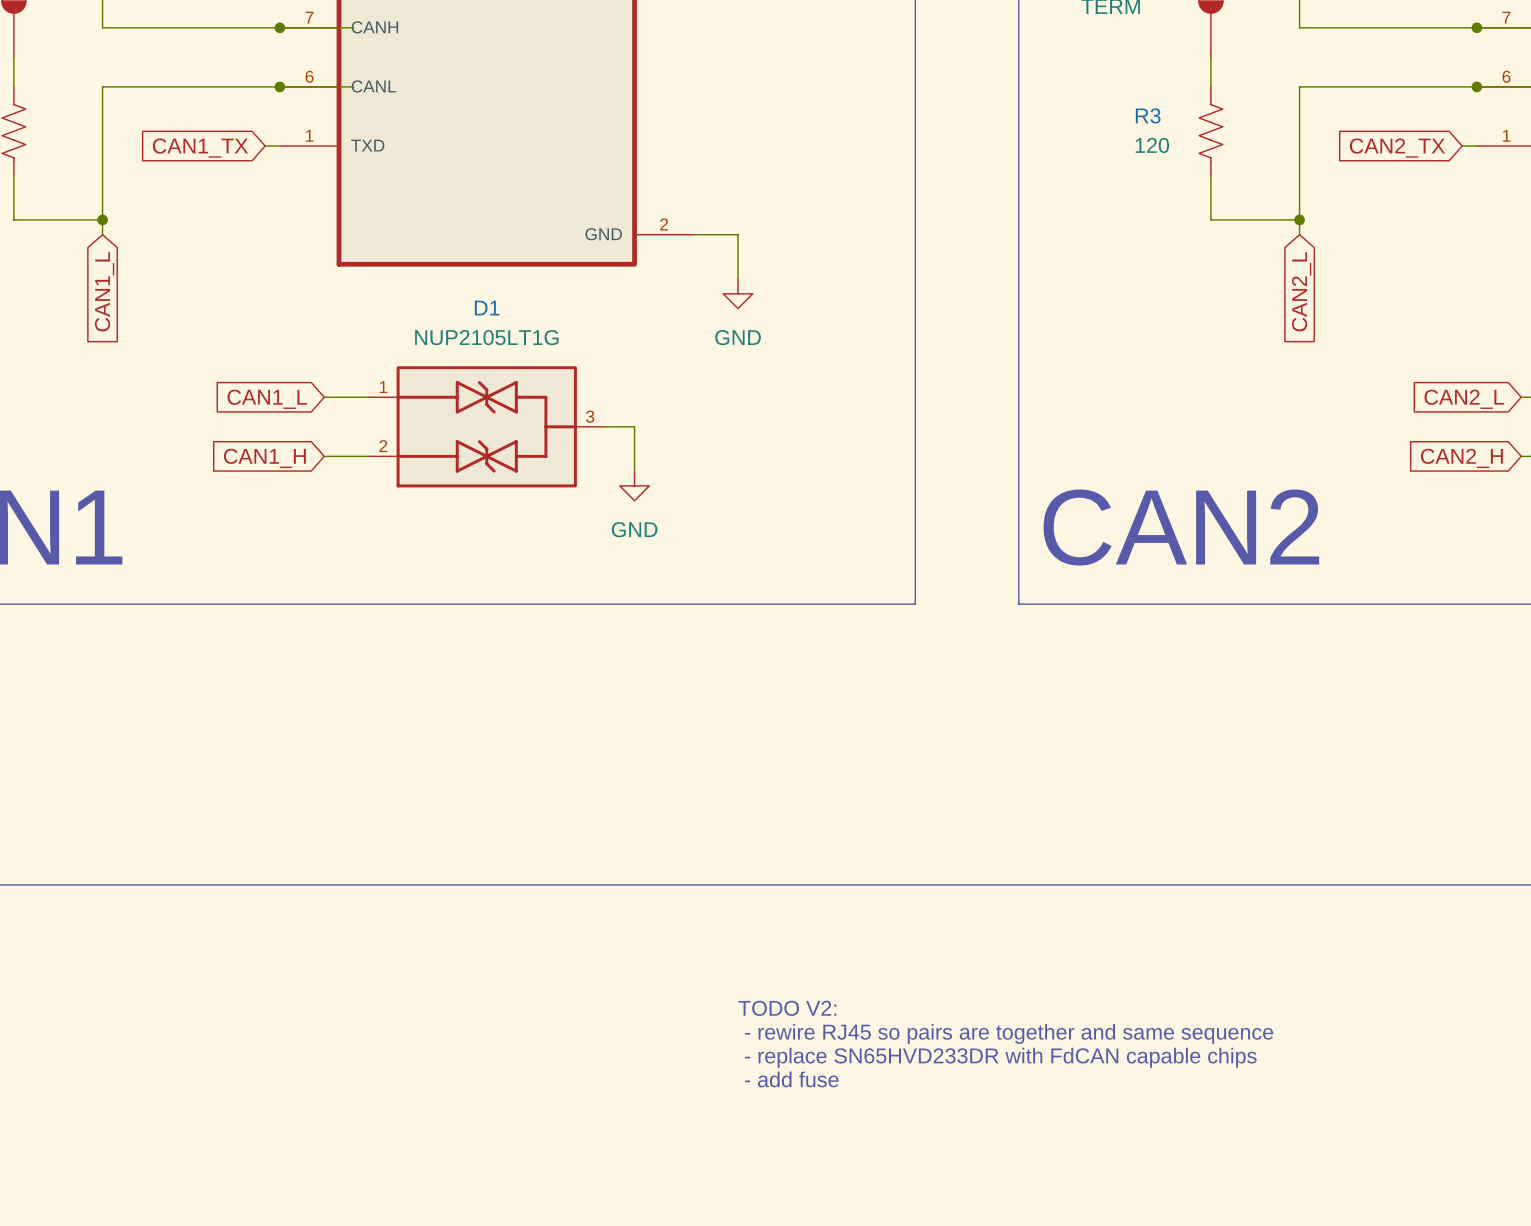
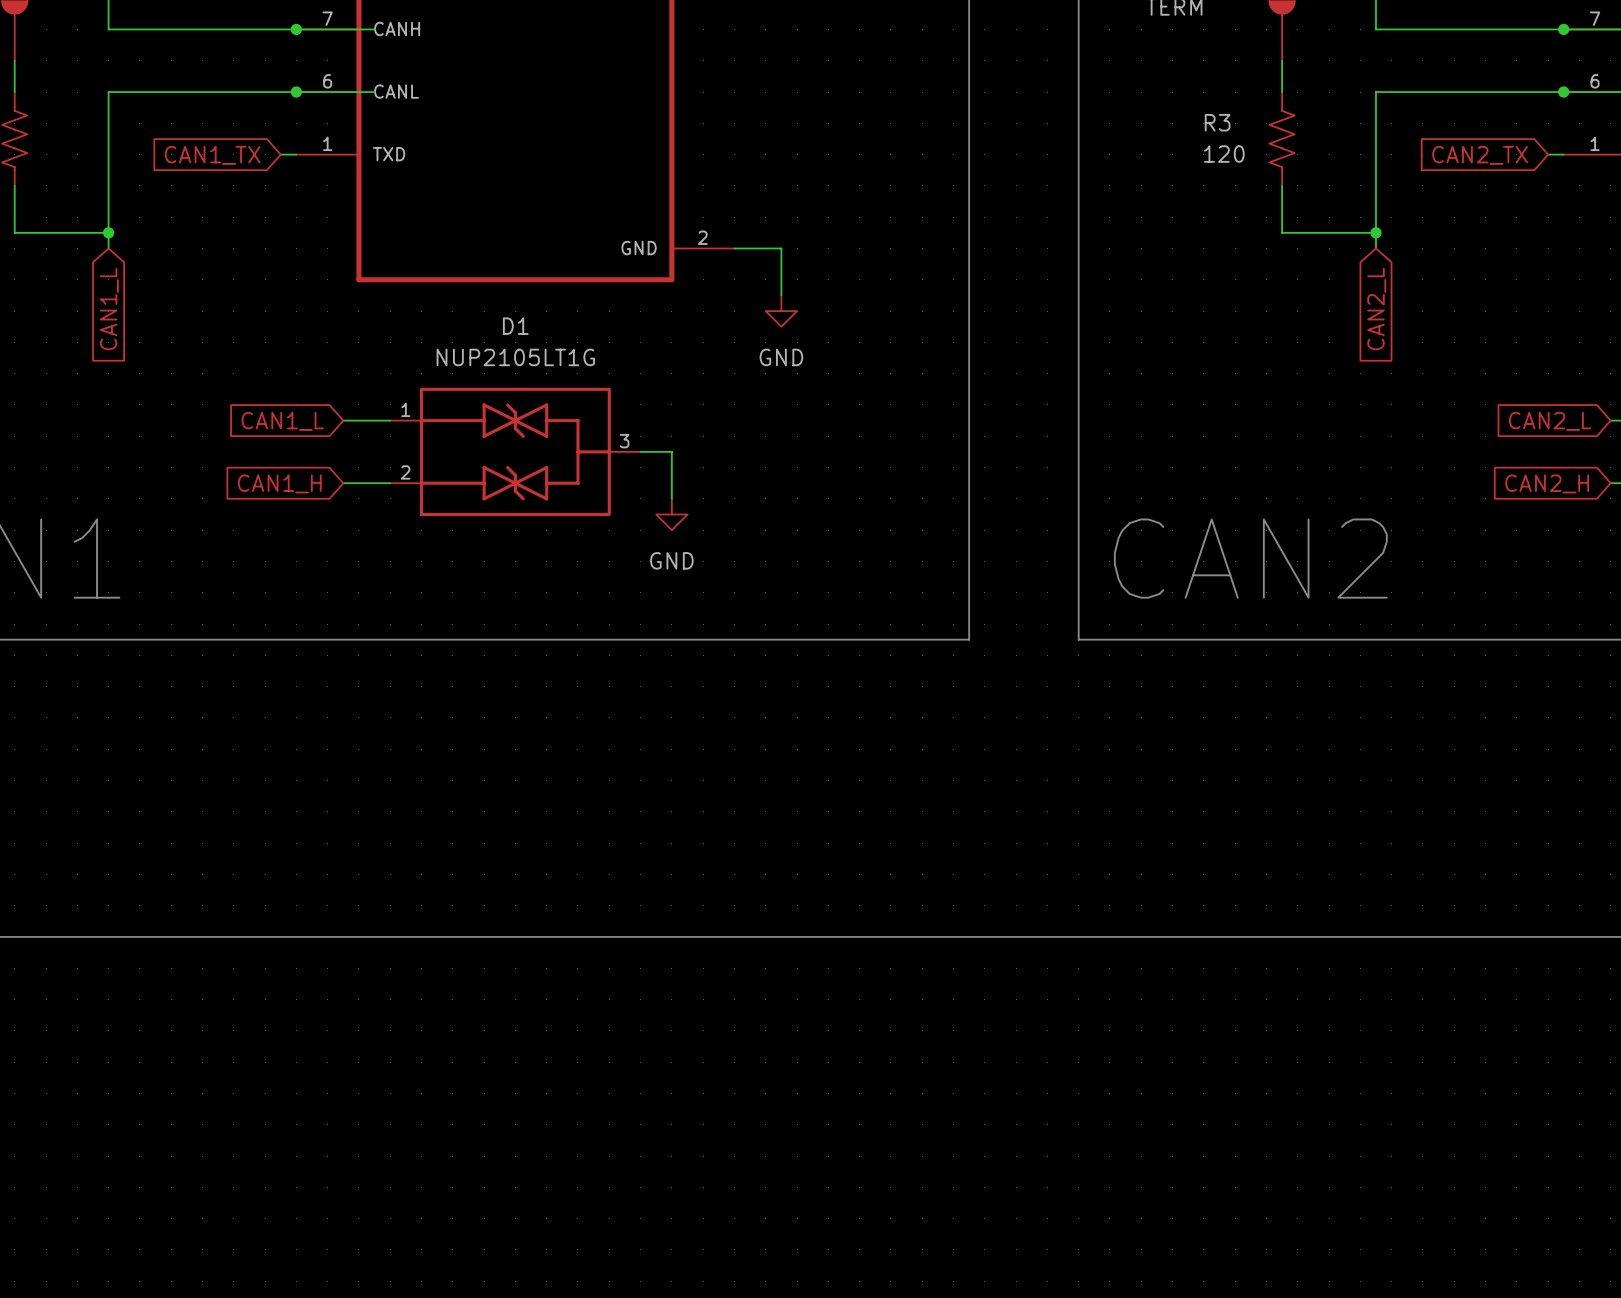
text: TODO V2: (787, 1008) -> none
text: - rewire RJ45 so pairs are together and same sequence (1009, 1033) -> none
text: - replace SN65HVD233DR with FdCAN capable chips (1000, 1057) -> none
text: - add fuse (791, 1079) -> none

